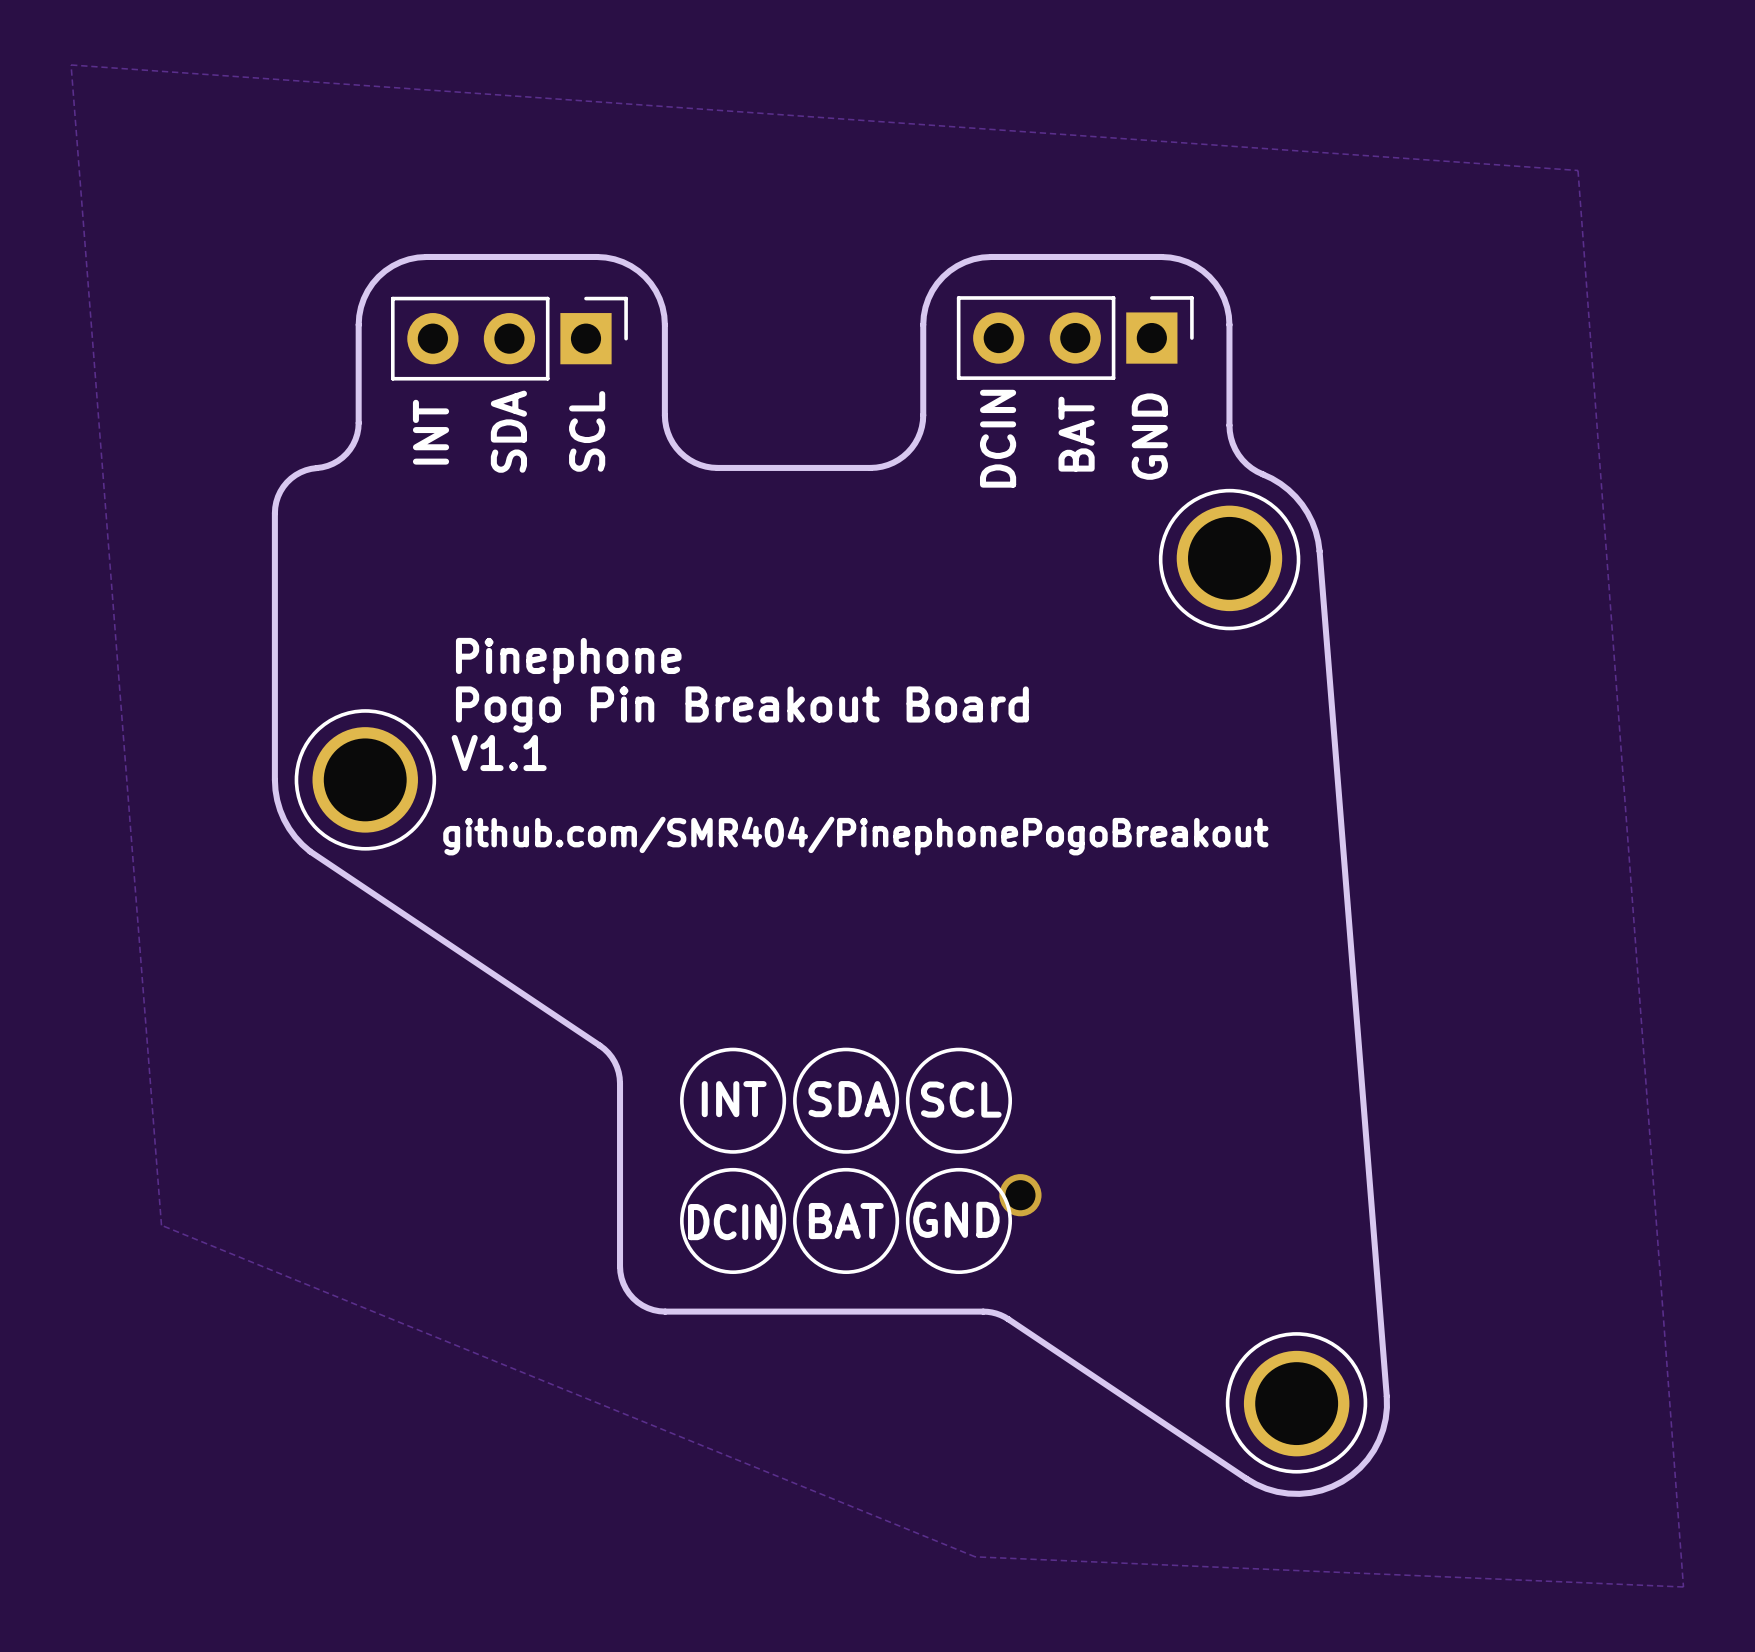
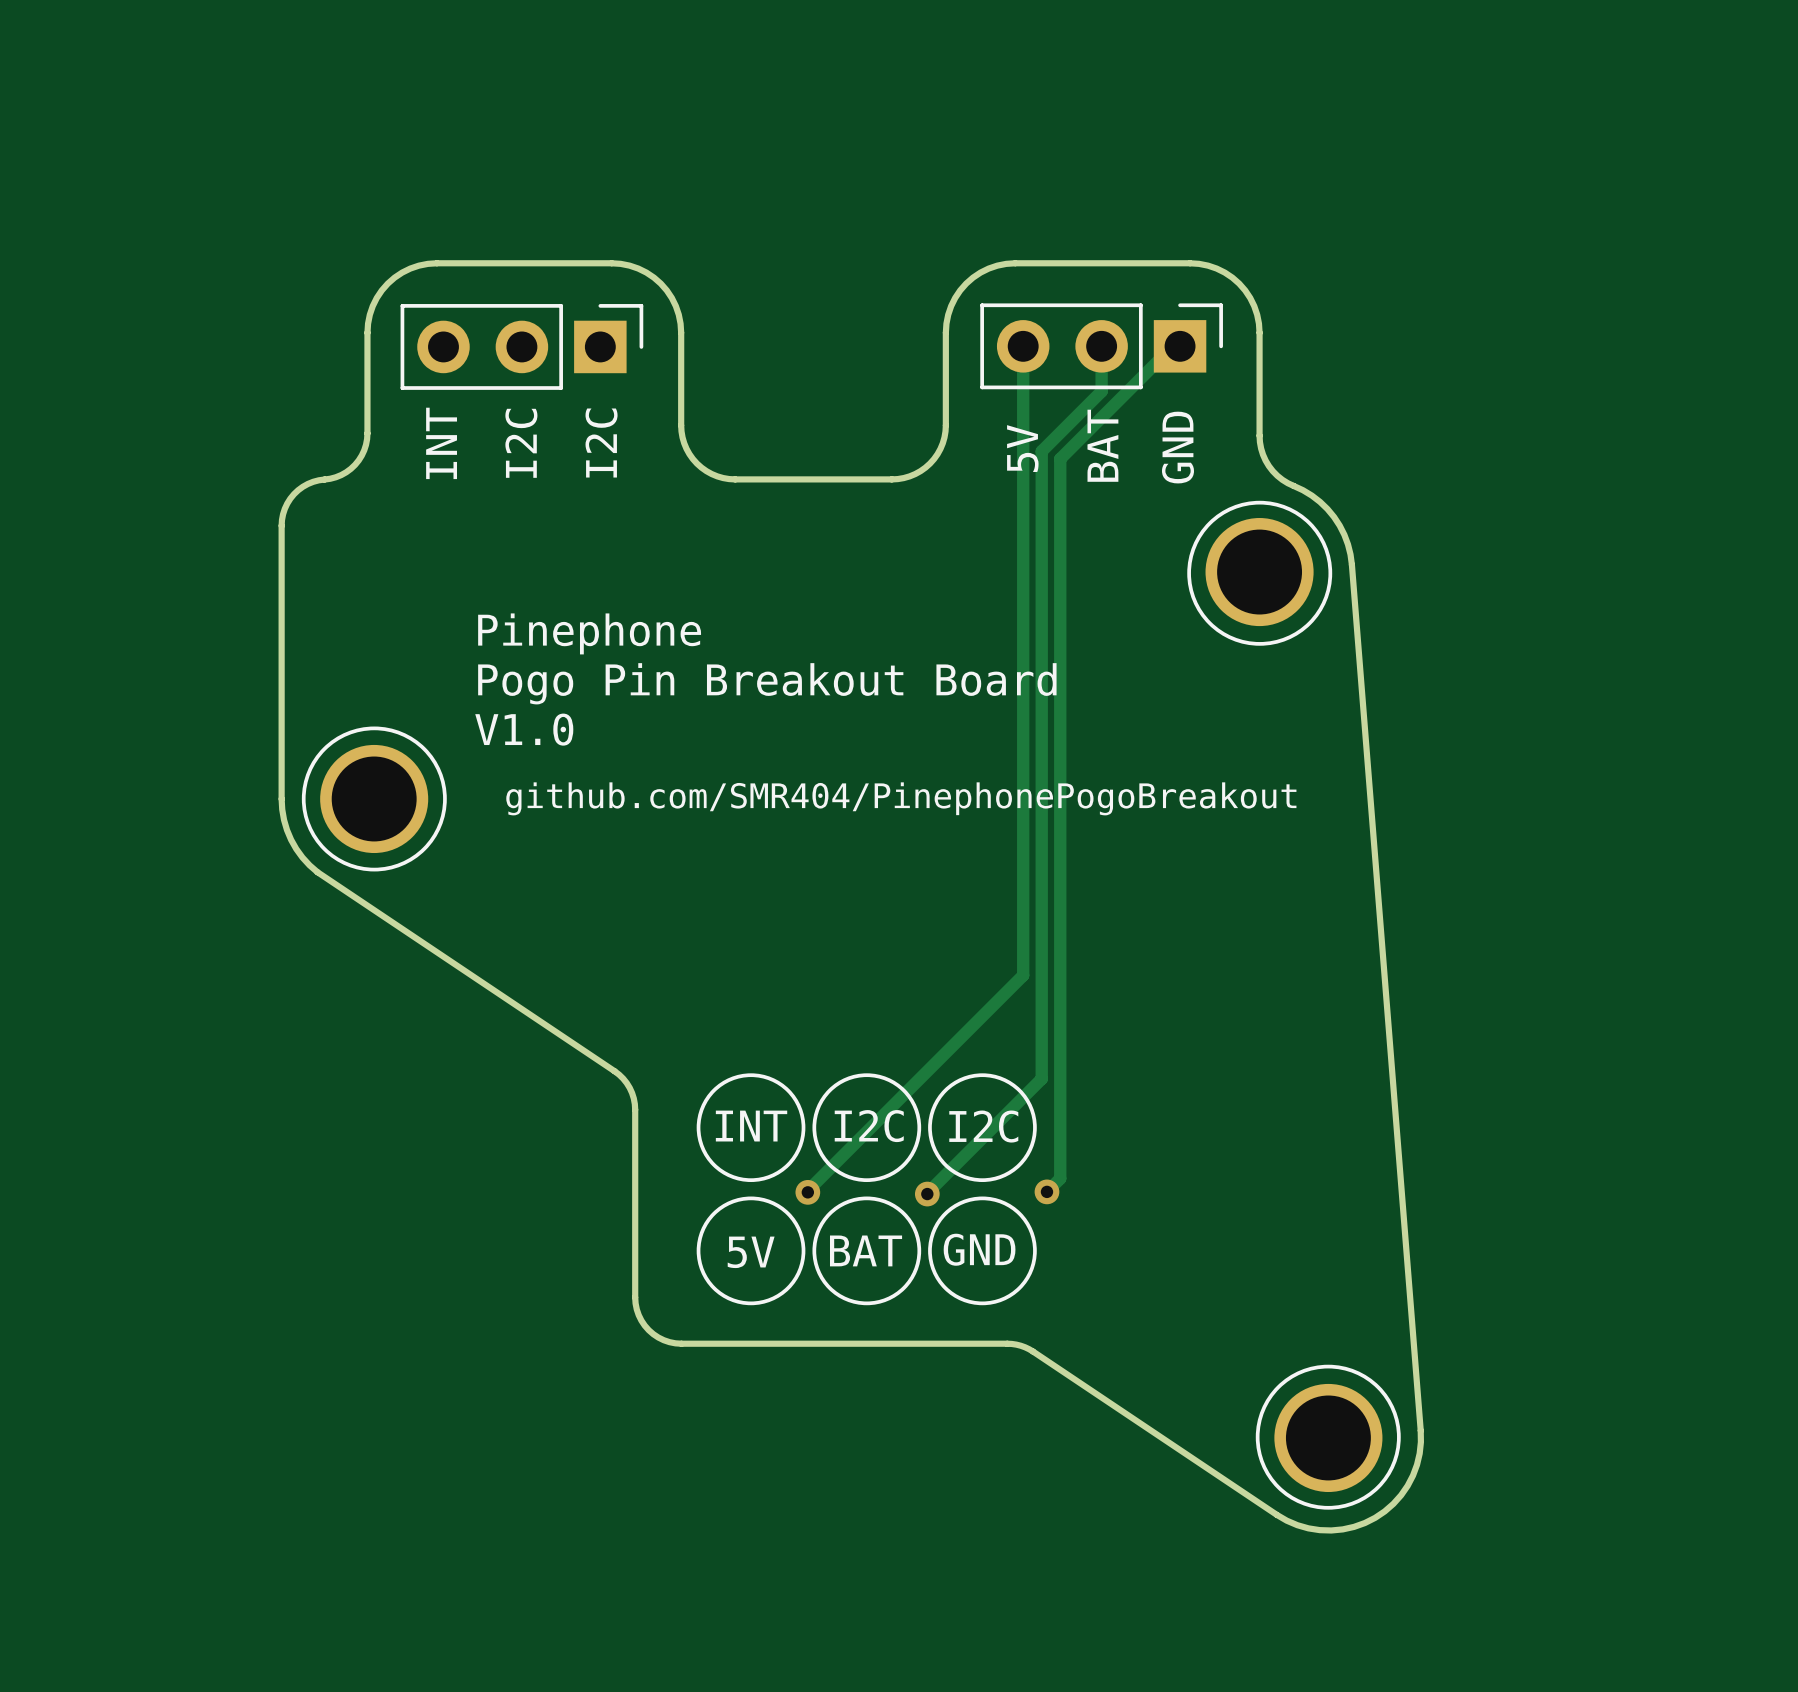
zone outline: (71, 65) (161, 1225) (975, 1556) (1683, 1586) (1578, 170) (71, 65) -> none
track: none -> (1023, 346) (1023, 975) (807, 1190) (808, 1192)
track: none -> (1101, 346) (1101, 391) (1041, 451) (1041, 1078) (927, 1194)
track: none -> (1180, 346) (1172, 346) (1060, 458) (1060, 1178) (1046, 1191)
text: SDA (508, 431) -> I2C (521, 443)
text: SCL (587, 431) -> I2C (601, 443)
text: DCIN (998, 438) -> 5V (1022, 448)
text position: Pinephone (568, 660) -> Pinephone (589, 633)
text position: Pogo Pin Breakout Board (742, 709) -> Pogo Pin Breakout Board (767, 683)
text: V1.1 (499, 752) -> V1.0 (524, 729)
text position: github.com/SMR404/PinephonePogoBreakout (855, 836) -> github.com/SMR404/PinephonePogoBreakout (901, 798)
text: SDA (849, 1099) -> I2C (869, 1126)
text: SCL (961, 1099) -> I2C (983, 1126)
via: none -> (807, 1192)
via: none -> (1046, 1191)
via: none -> (927, 1194)
via: (1020, 1195) -> none
text: DCIN (732, 1222) -> 5V (751, 1252)

